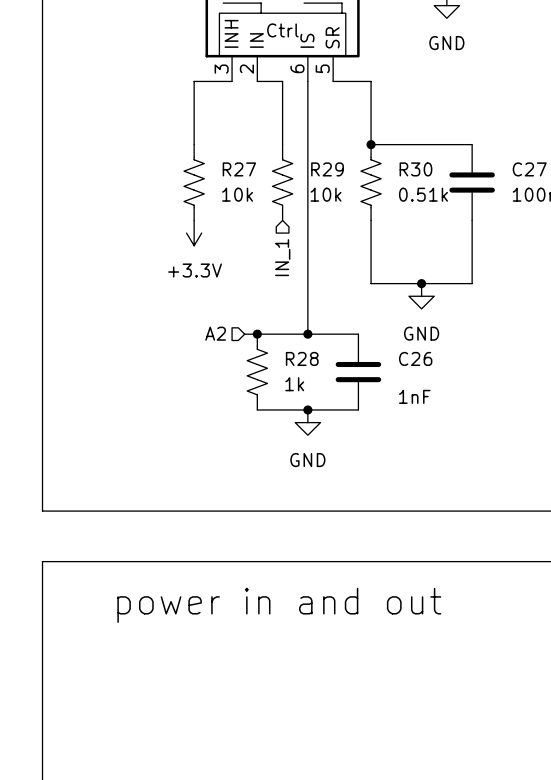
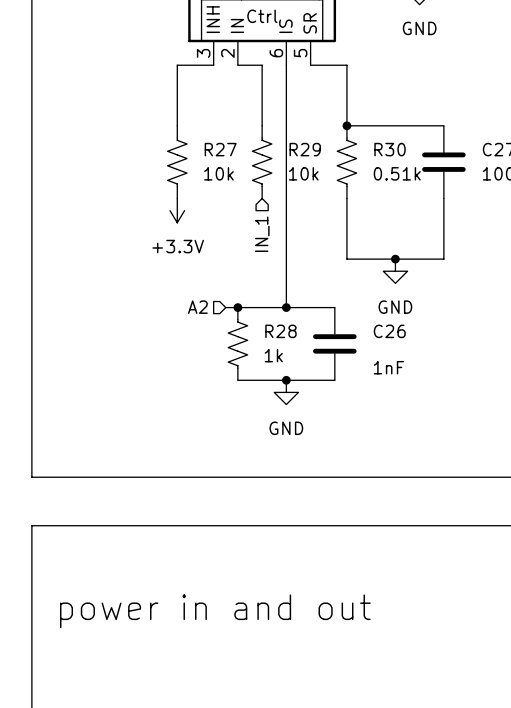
text position: power in and out (279, 605) -> power in and out (215, 611)

